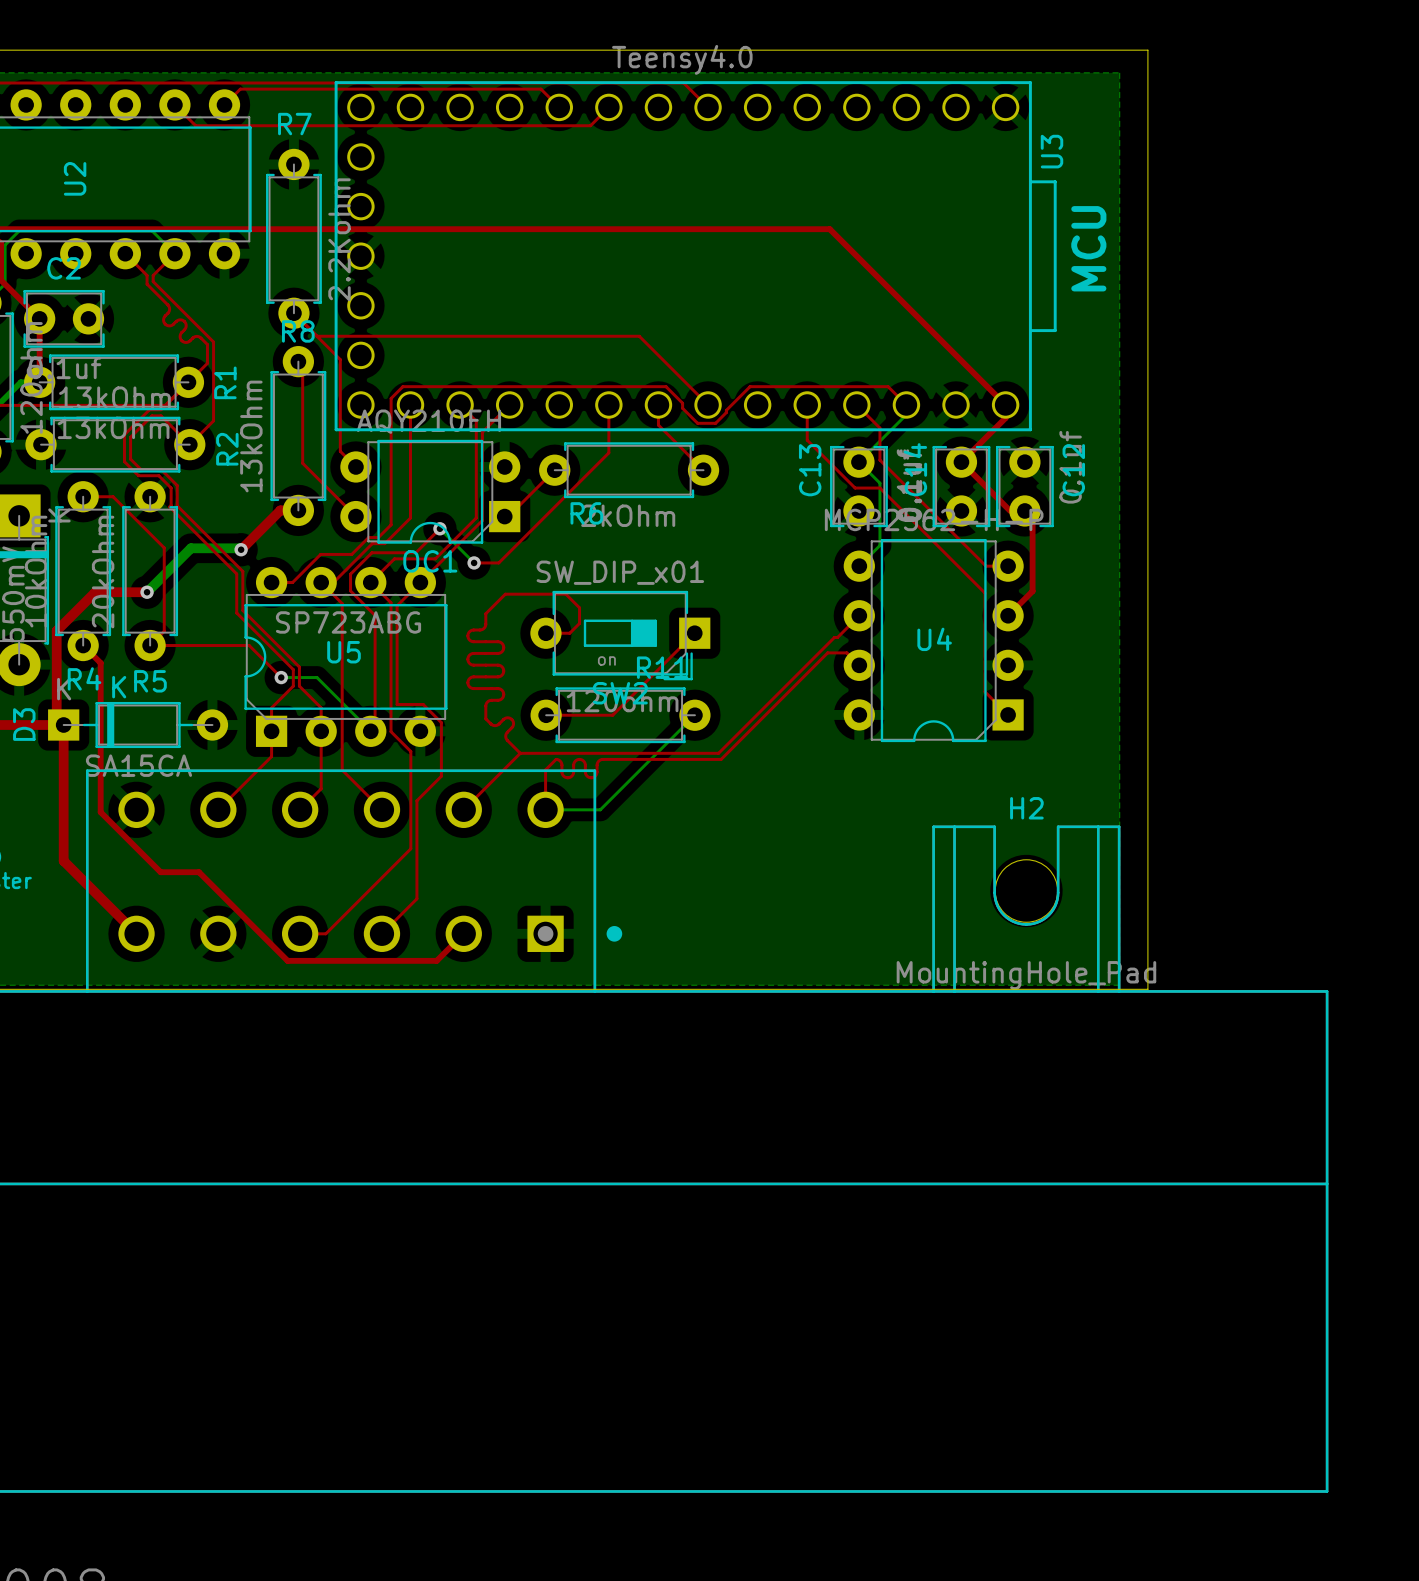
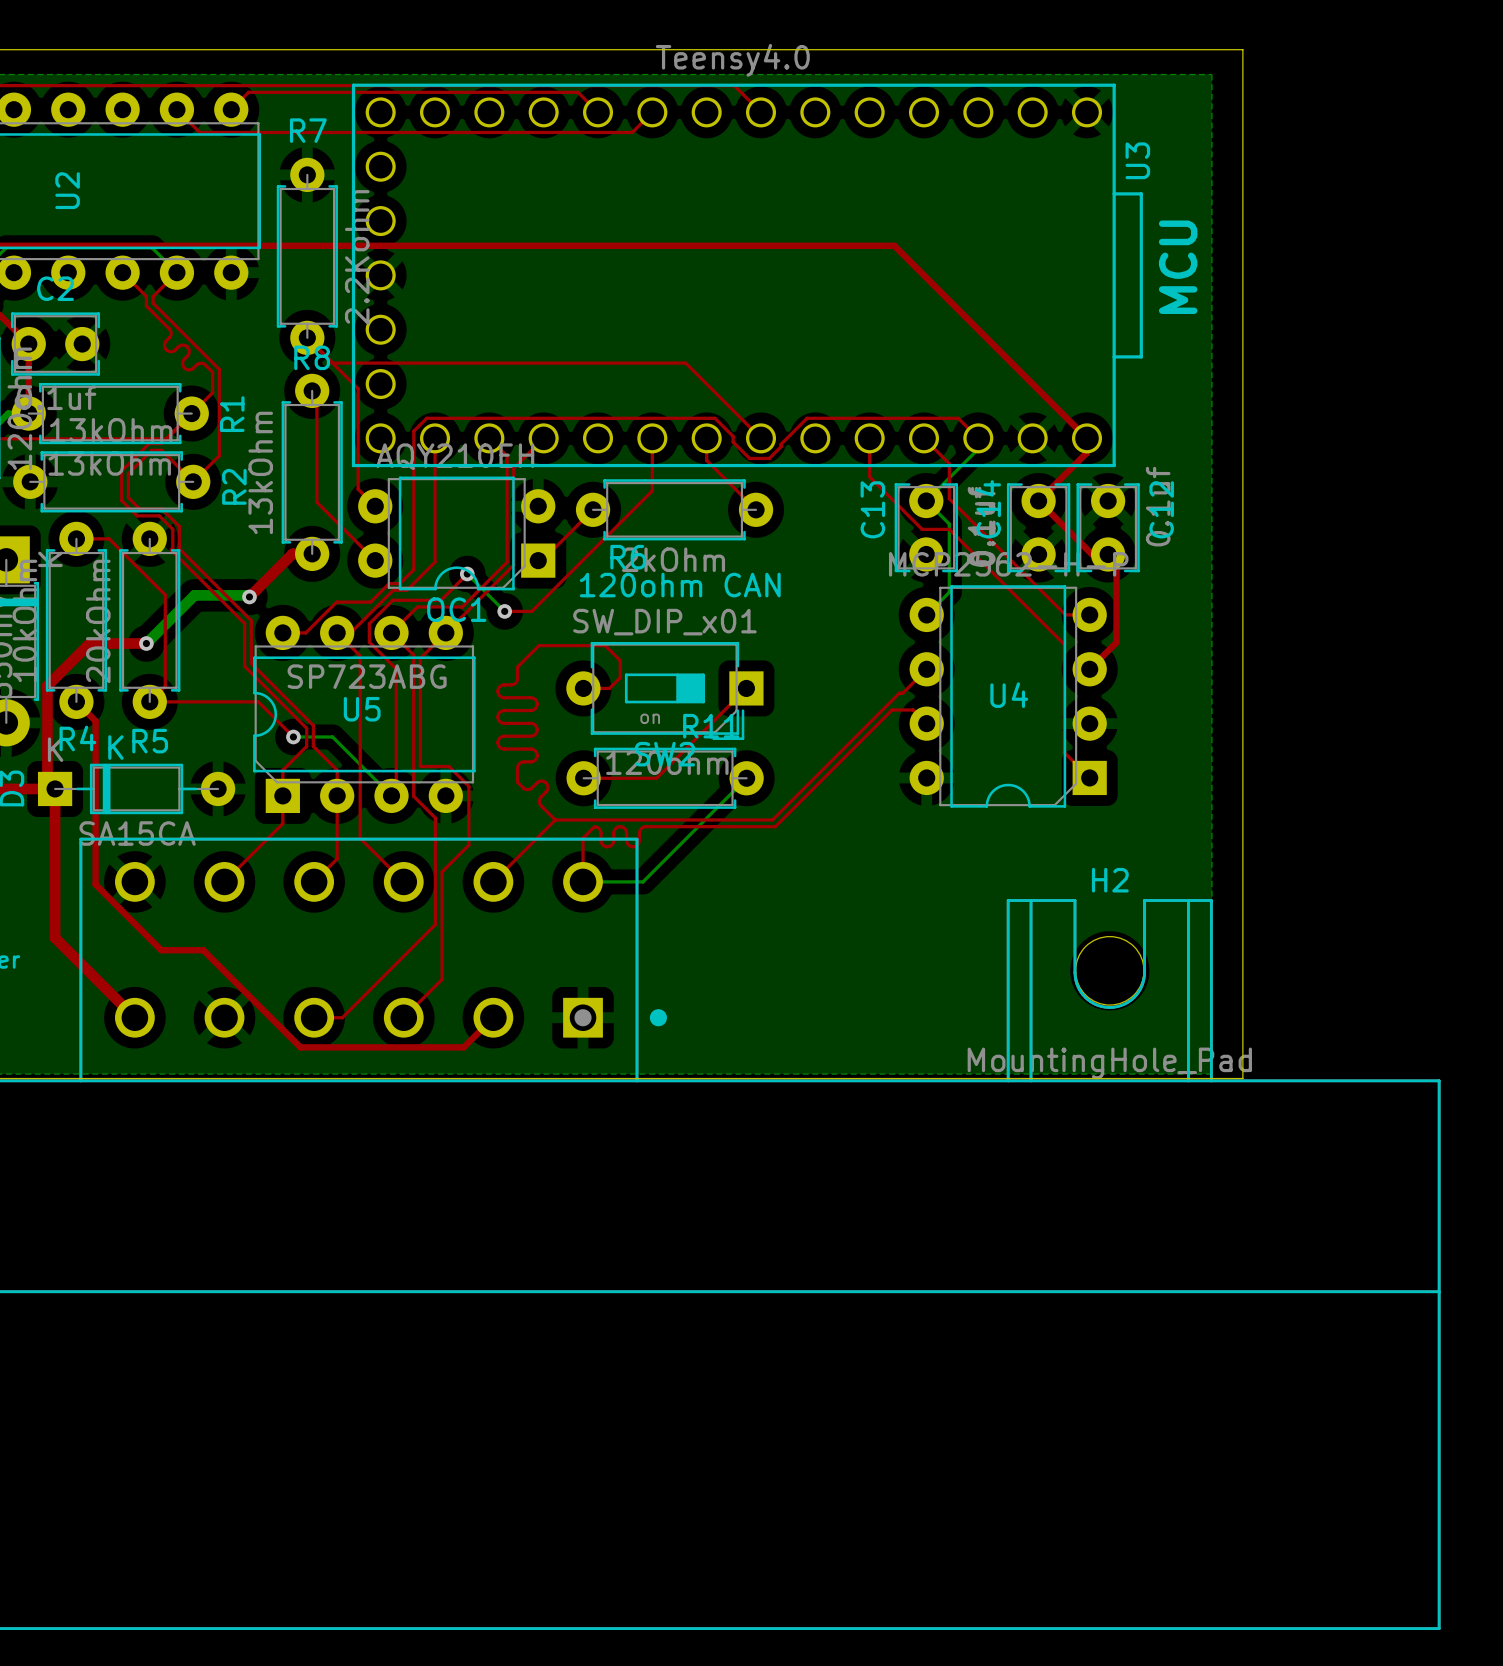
text: none -> 120ohm CAN (680, 585)

